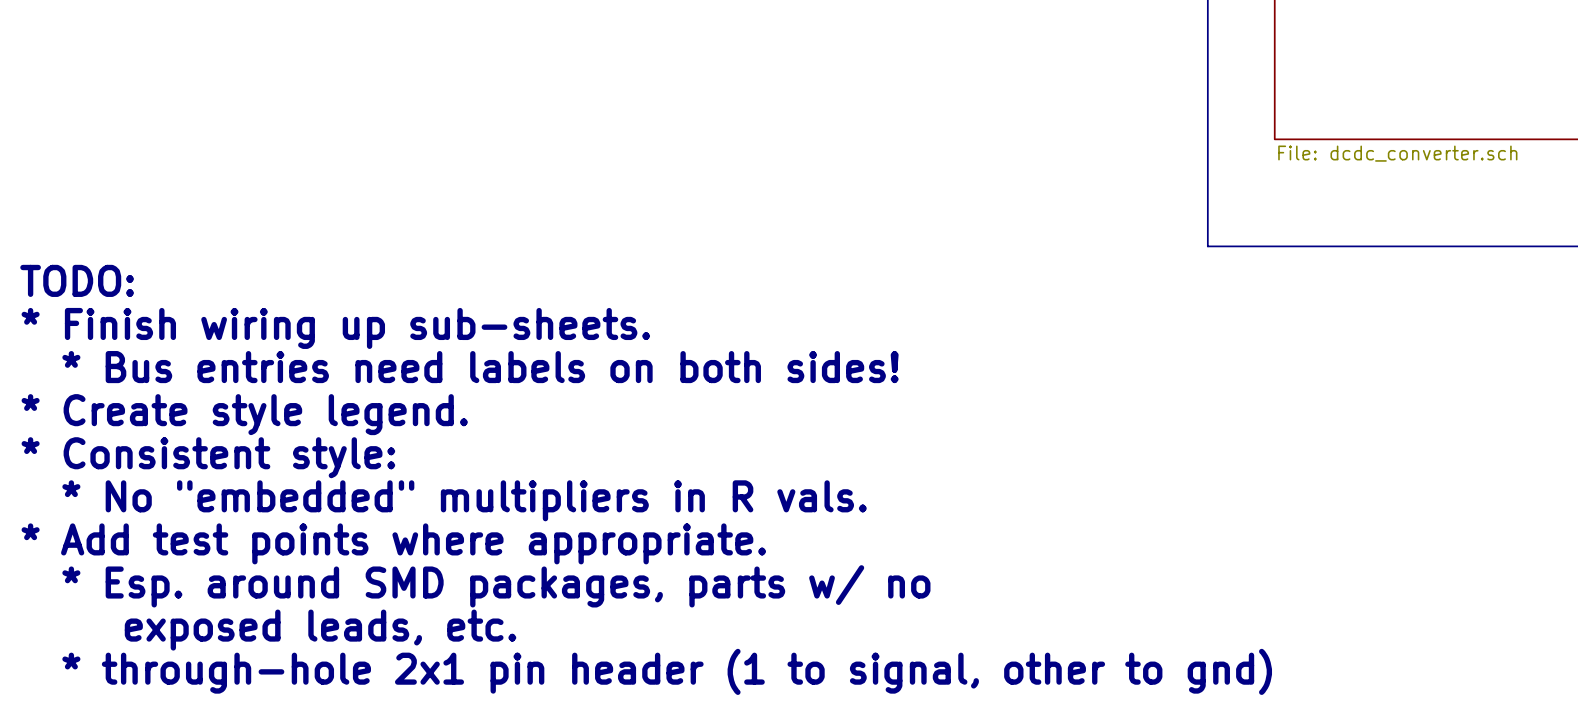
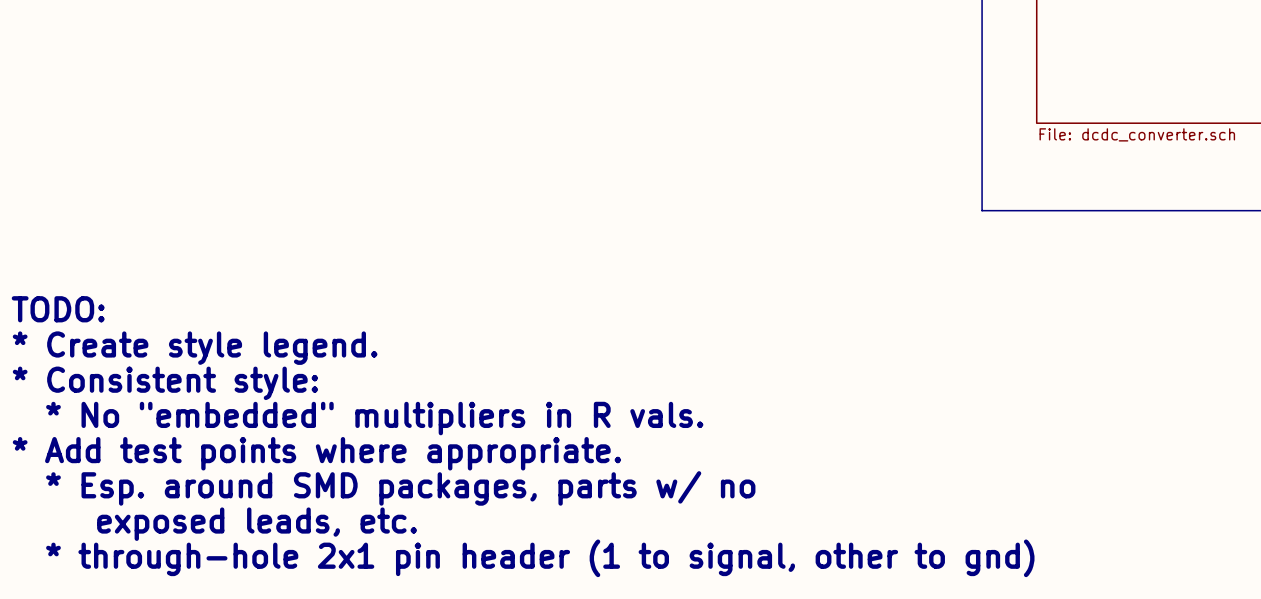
text: TODO: (77, 280) -> none
text: * Finish wiring up sub-sheets. (335, 328) -> none
text: * Bus entries need labels on both sides! (480, 367) -> TODO: (58, 309)

